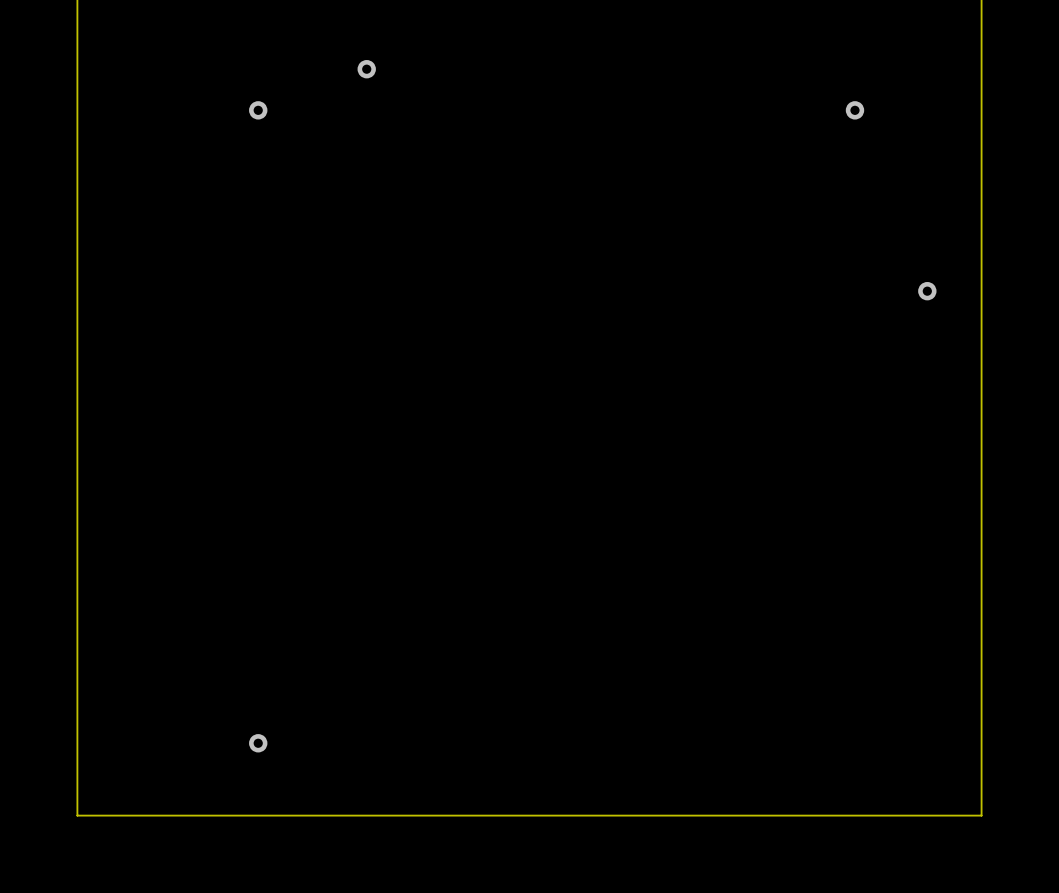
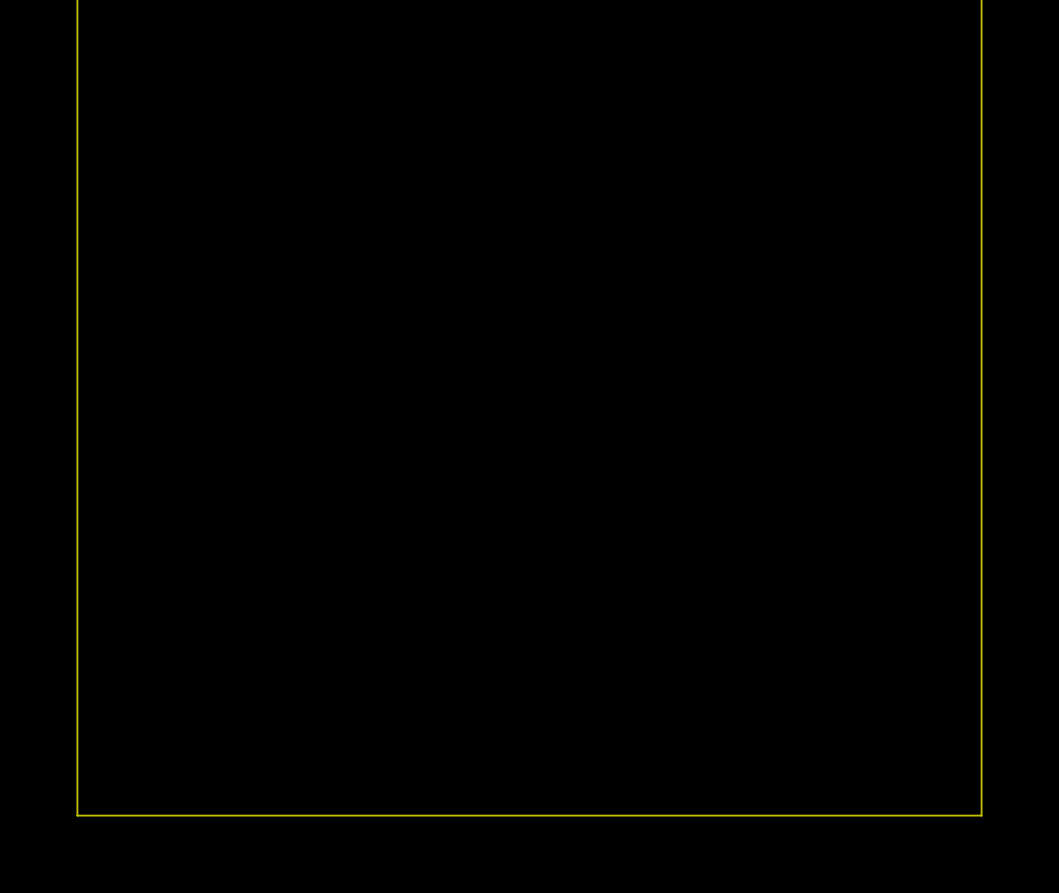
via: (366, 69) -> none
via: (258, 110) -> none
via: (854, 110) -> none
via: (927, 291) -> none
via: (258, 743) -> none

